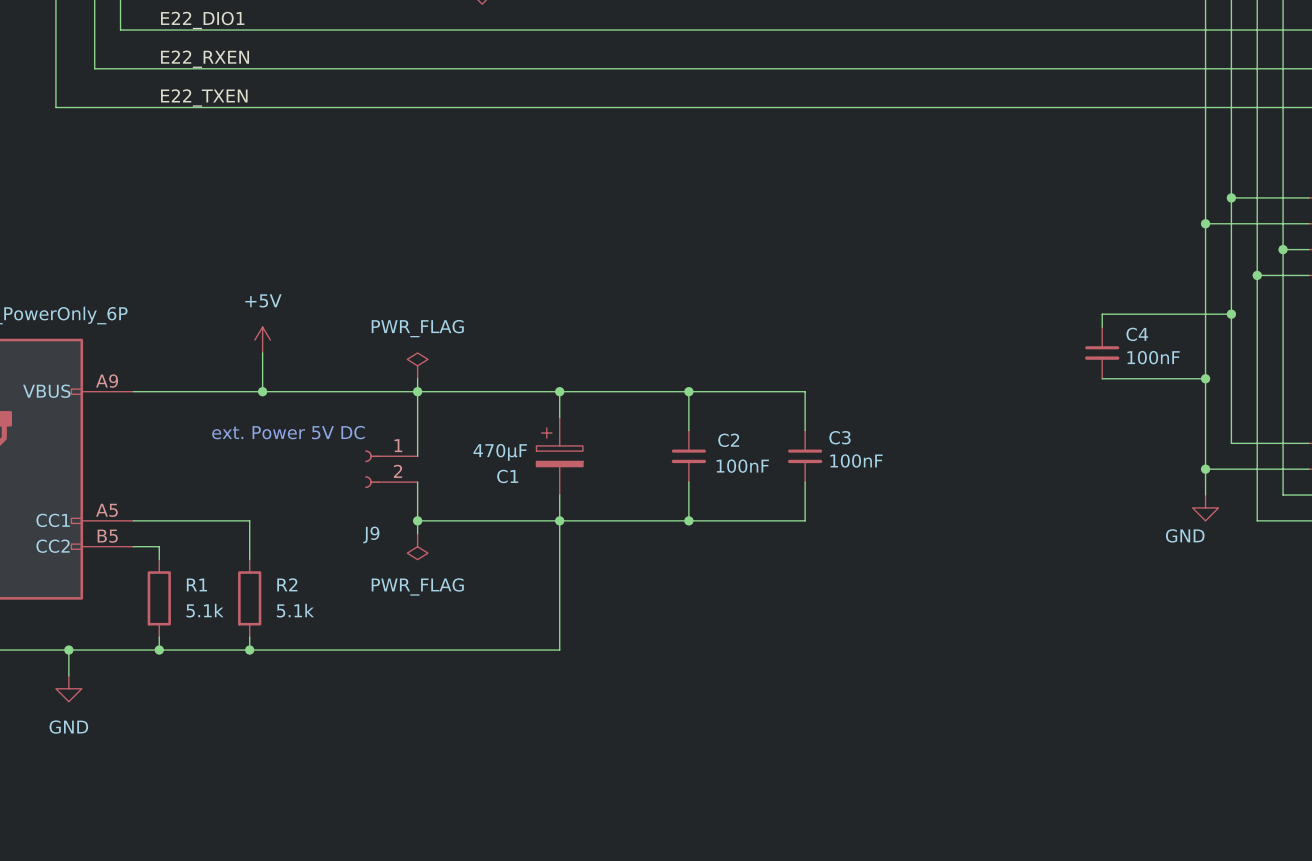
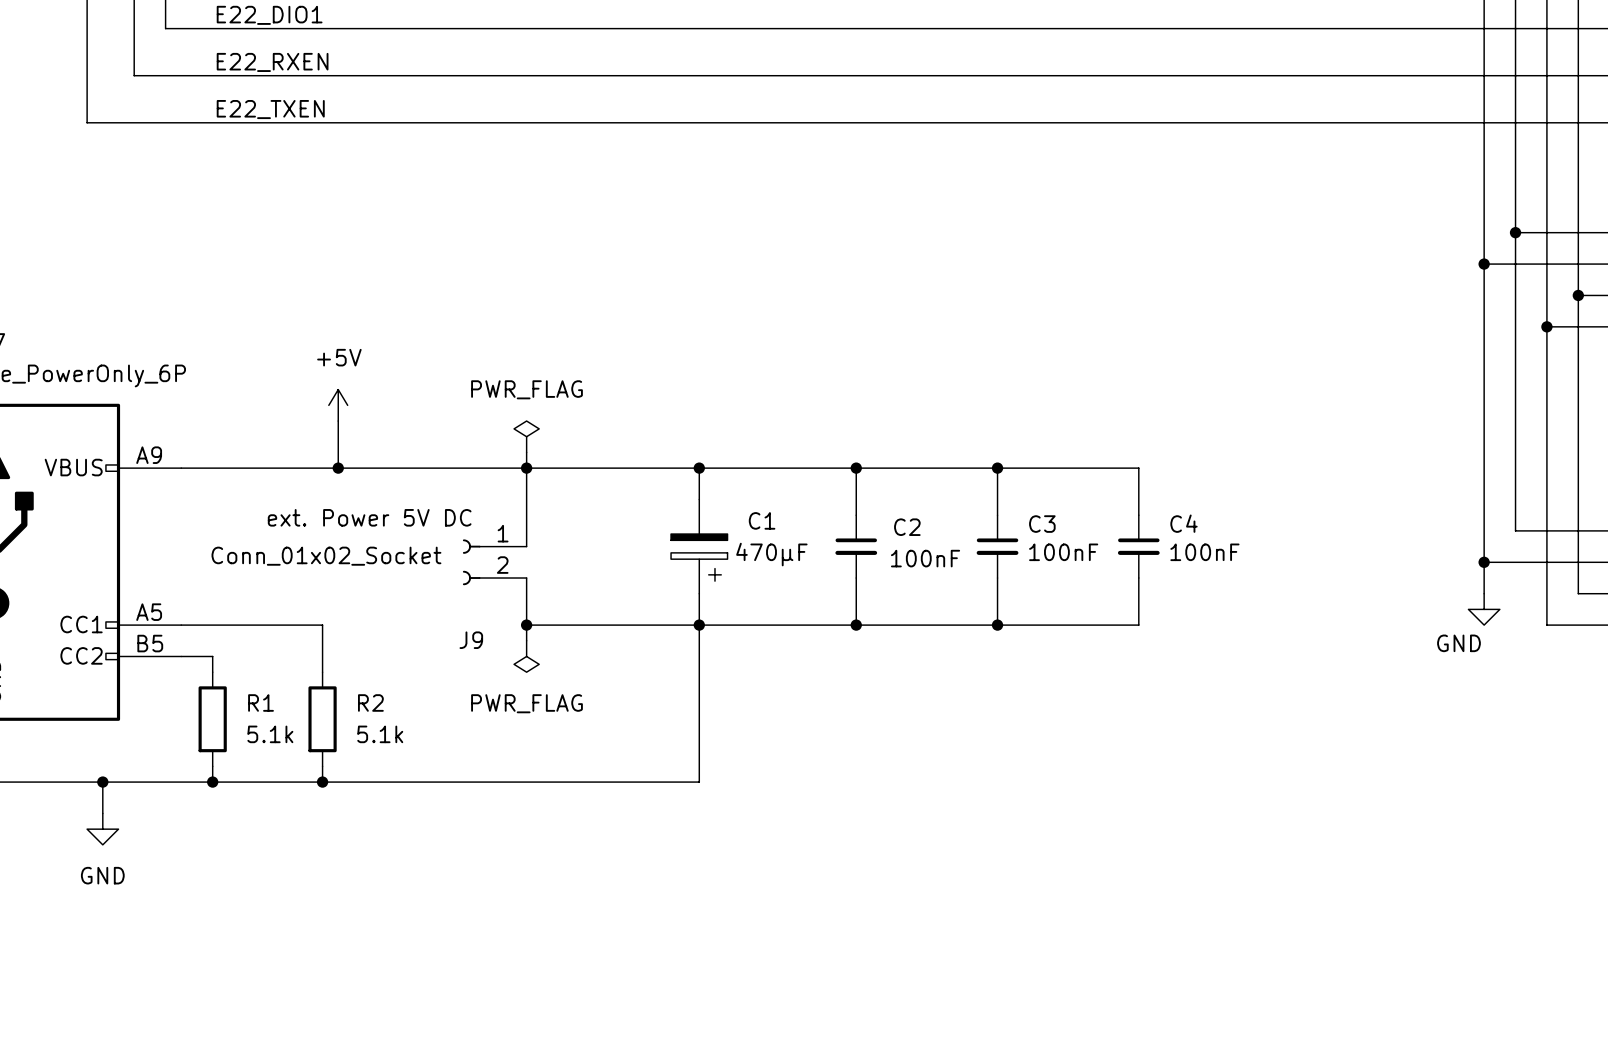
wire: (1231, 314) (1102, 314) (1102, 327) -> none
junction: (1231, 314) -> none
C4 position: (1102, 352) -> (1138, 546)
wire: (1102, 378) (1205, 378) -> none
junction: (1205, 378) -> none
wire: none -> (997, 468) (1138, 468) (1138, 515)
junction: none -> (997, 468)
C1 rotation: 0° (559, 447) -> 180° (699, 557)
J9 value: none -> Conn_01x02_Socket (326, 556)
wire: none -> (1138, 578) (1138, 625) (997, 625)
junction: none -> (997, 625)

